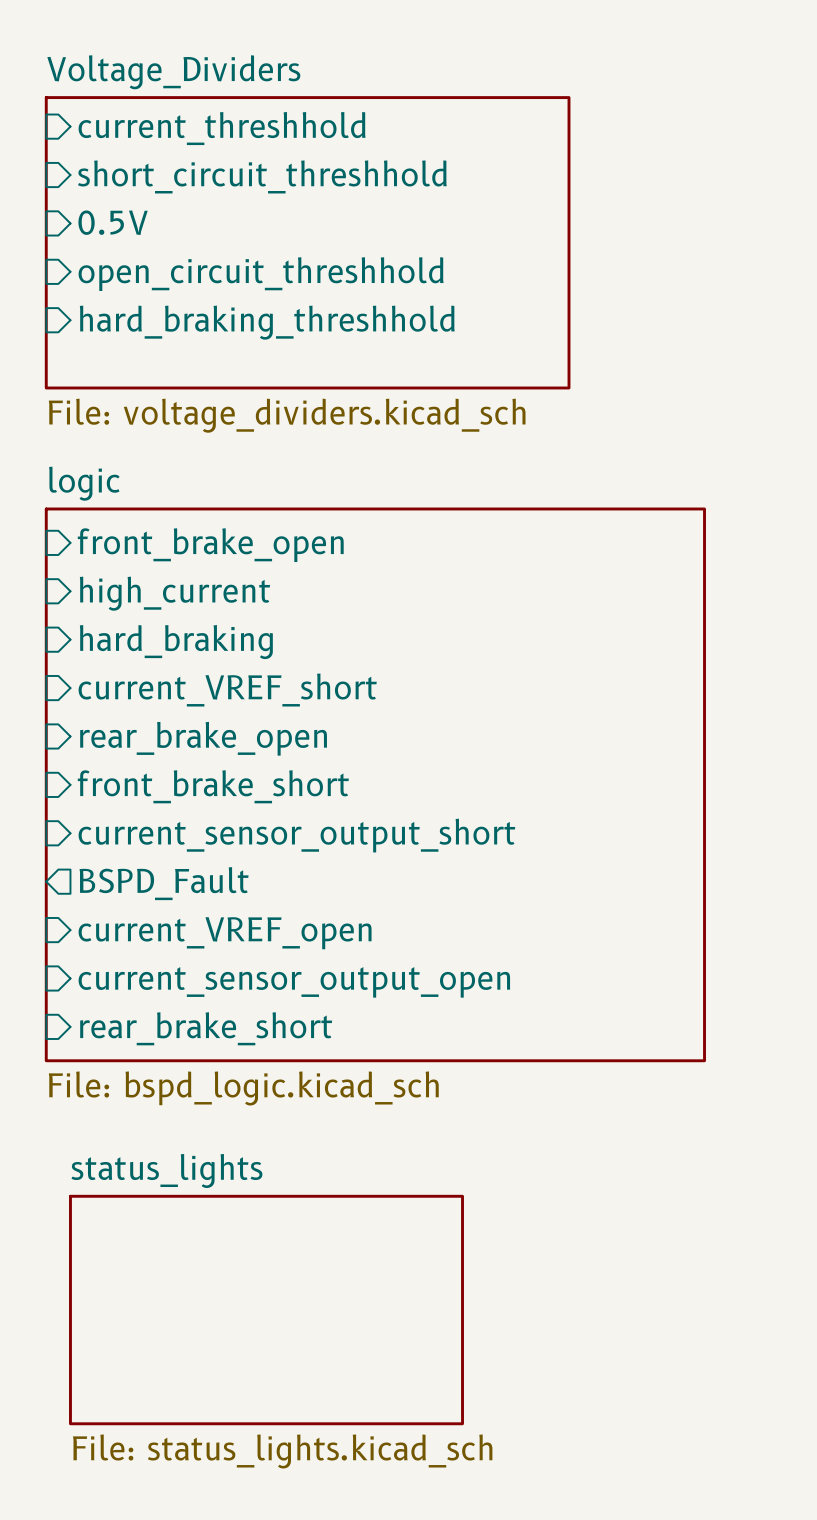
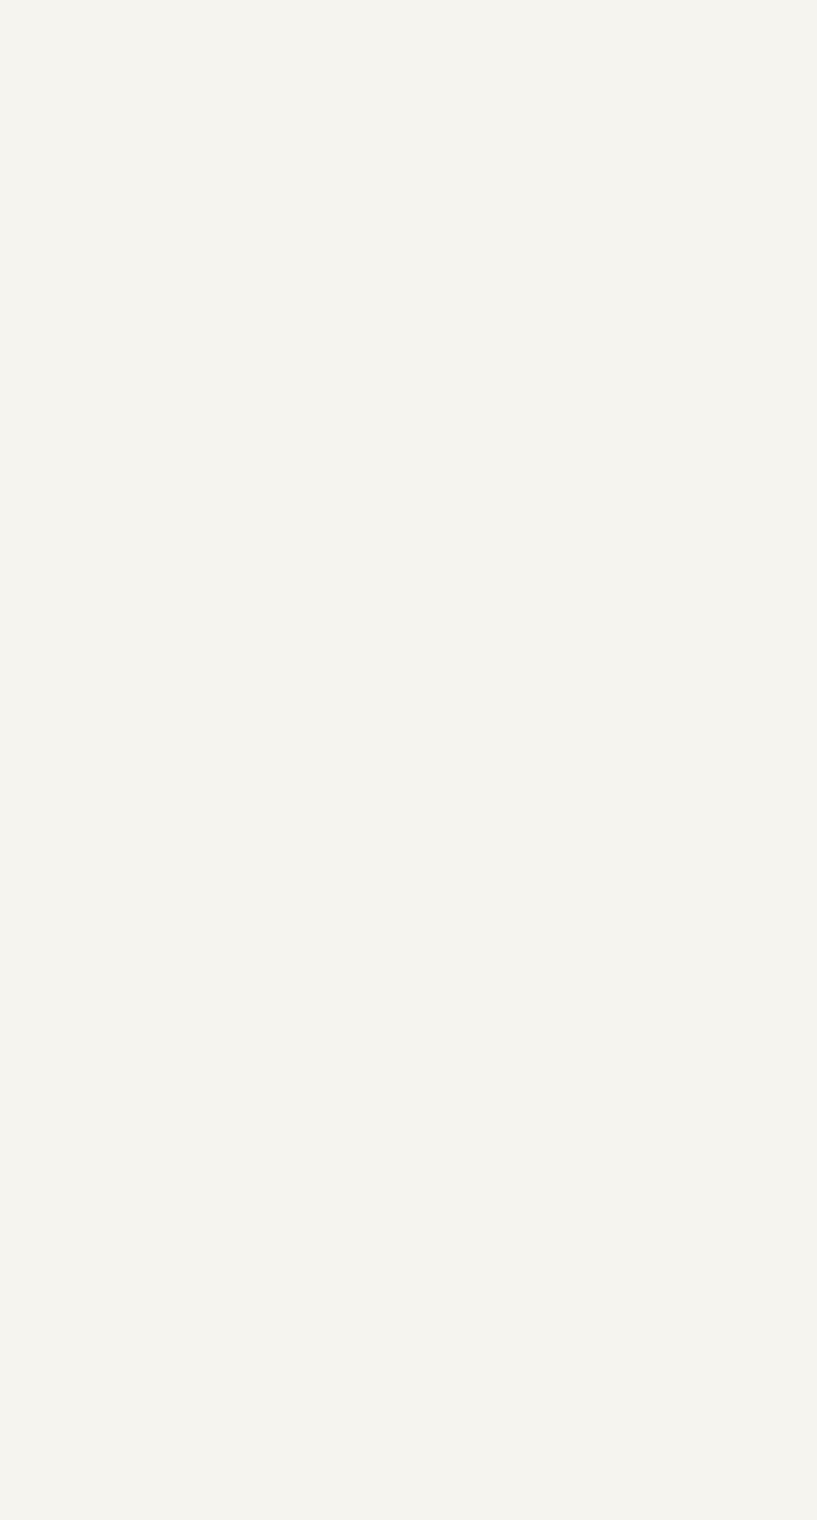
sheet pin: current_threshhold (222, 128) -> none
sheet pin: short_circuit_threshhold (262, 176) -> none
sheet pin: 0.5V (113, 222) -> none
sheet Voltage_Dividers: File: voltage_dividers.kicad_sch (307, 242) -> none
sheet pin: open_circuit_threshhold (261, 274) -> none
sheet pin: hard_braking_threshhold (267, 322) -> none
sheet pin: front_brake_open (210, 545) -> none
sheet pin: high_current (174, 593) -> none
sheet pin: hard_braking (176, 642) -> none
sheet pin: current_VREF_short (227, 689) -> none
sheet pin: rear_brake_open (203, 738) -> none
sheet logic: File: bspd_logic.kicad_sch (375, 784) -> none
sheet pin: front_brake_short (213, 786) -> none
sheet pin: current_sensor_output_short (296, 835) -> none
sheet pin: BSPD_Fault (164, 883) -> none
sheet pin: current_VREF_open (225, 933) -> none
sheet pin: current_sensor_output_open (294, 982) -> none
sheet pin: rear_brake_short (206, 1028) -> none
sheet status_lights: File: status_lights.kicad_sch (266, 1310) -> none

